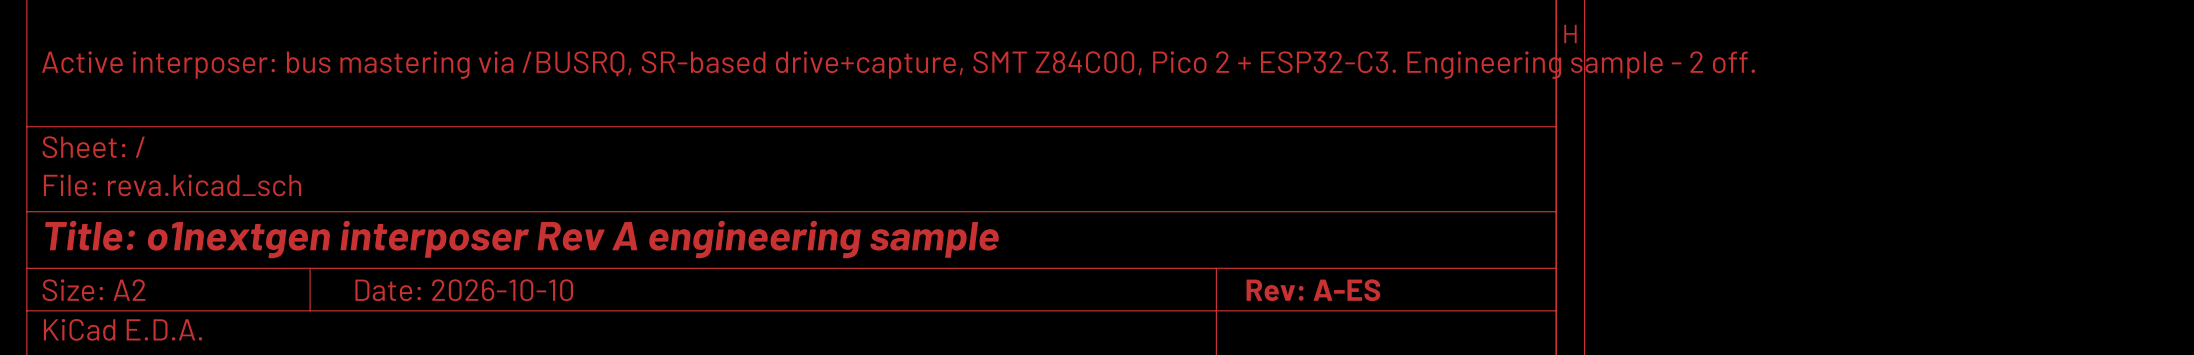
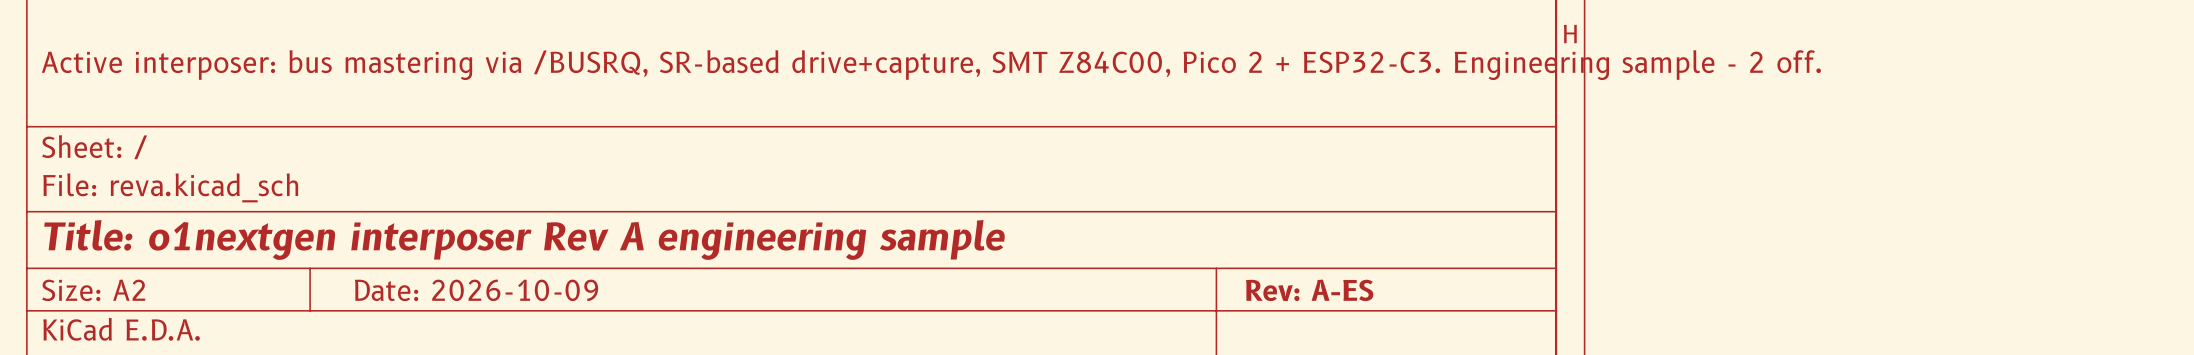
title block: Date: 2026-10-10 (464, 290) -> Date: 2026-10-09 (476, 290)

